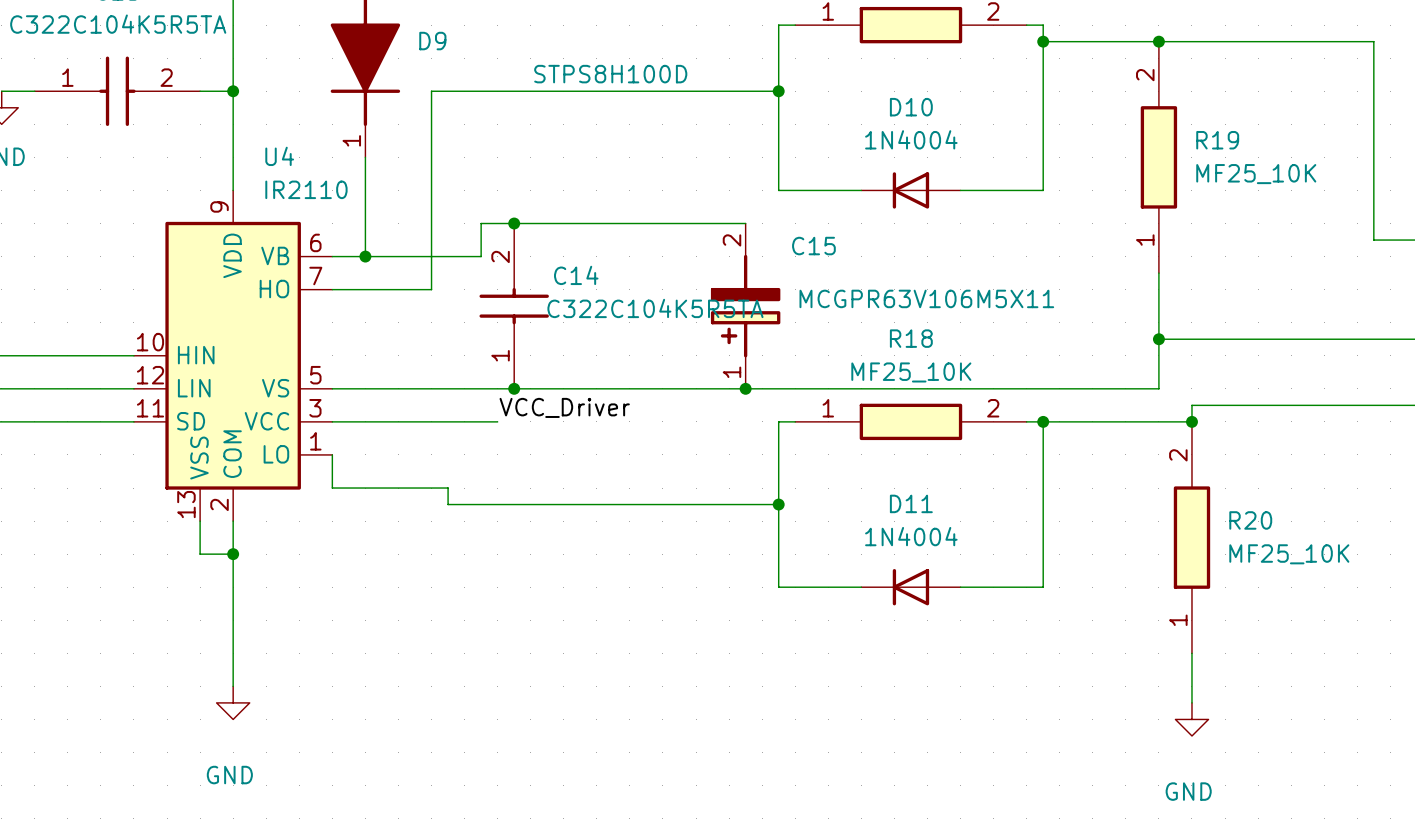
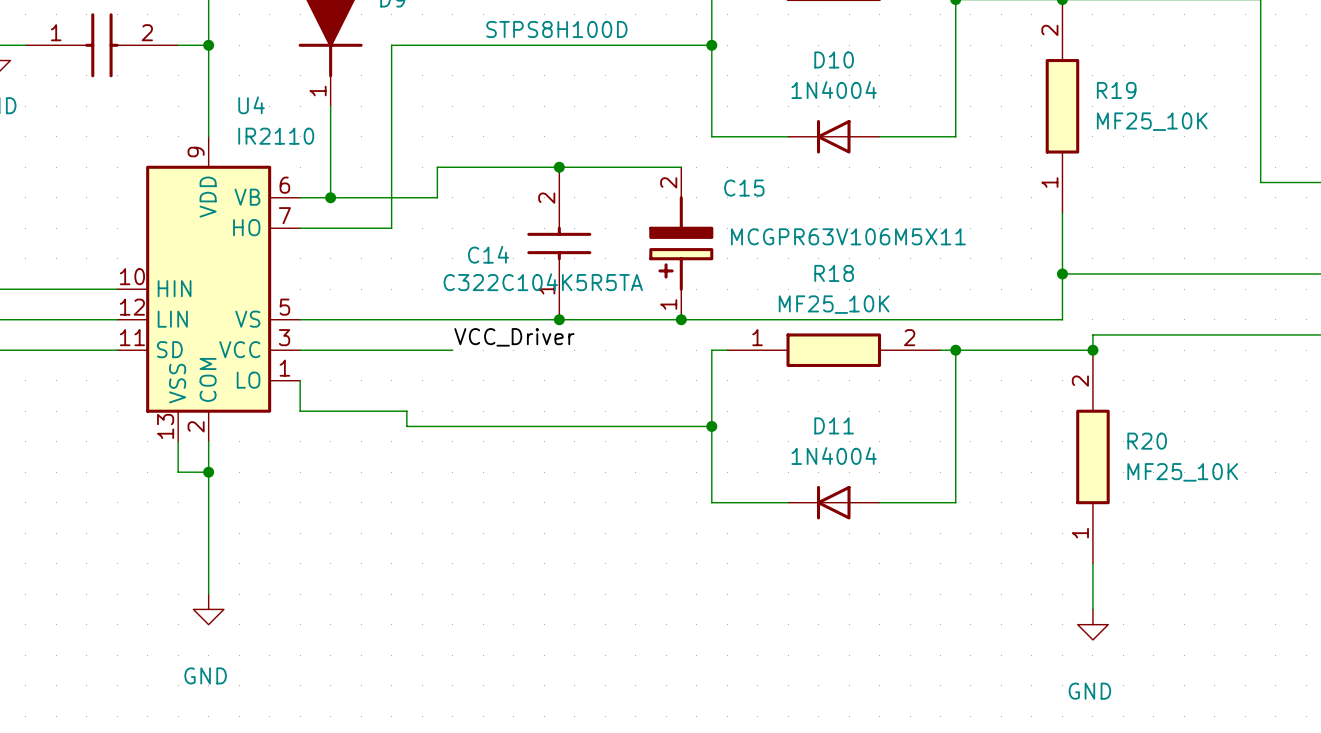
junction: (514, 223) -> none
junction: none -> (559, 167)
C14 name position: C14 (576, 275) -> C14 (488, 254)
C14 position: (514, 306) -> (559, 243)
C14 value position: C322C104K5R5TA (655, 308) -> C322C104K5R5TA (543, 282)
junction: (514, 388) -> none
junction: none -> (559, 319)

